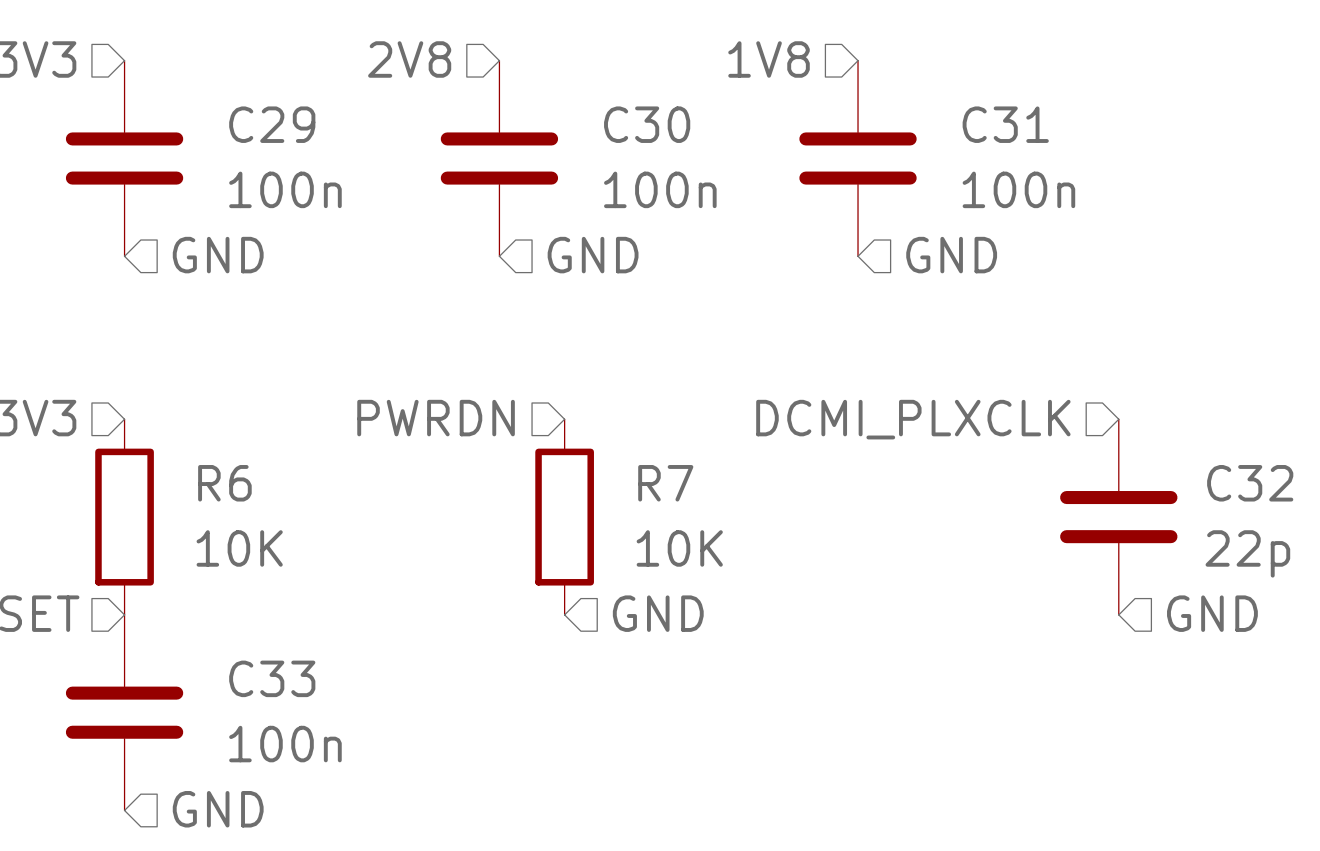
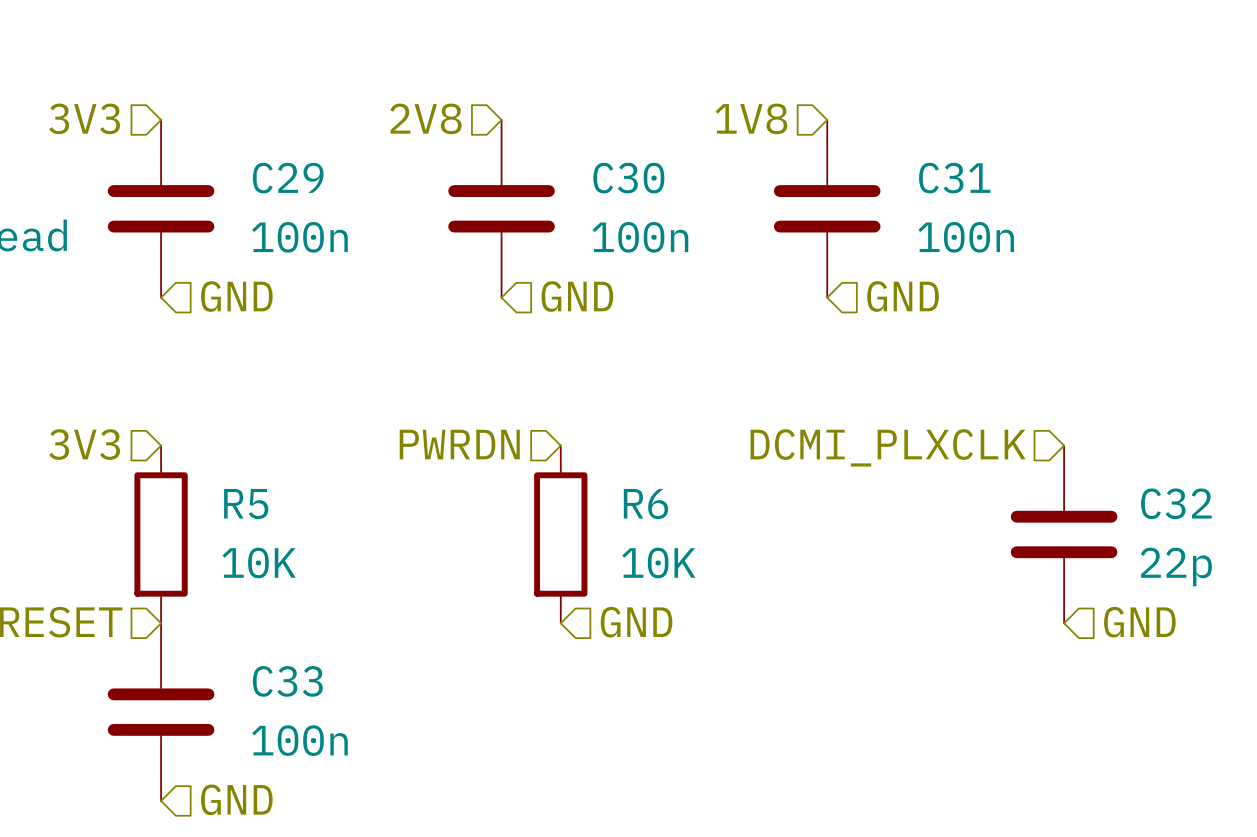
R6 name: R6 (224, 483) -> R5 (246, 504)
R7 name: R7 (665, 483) -> R6 (645, 504)

